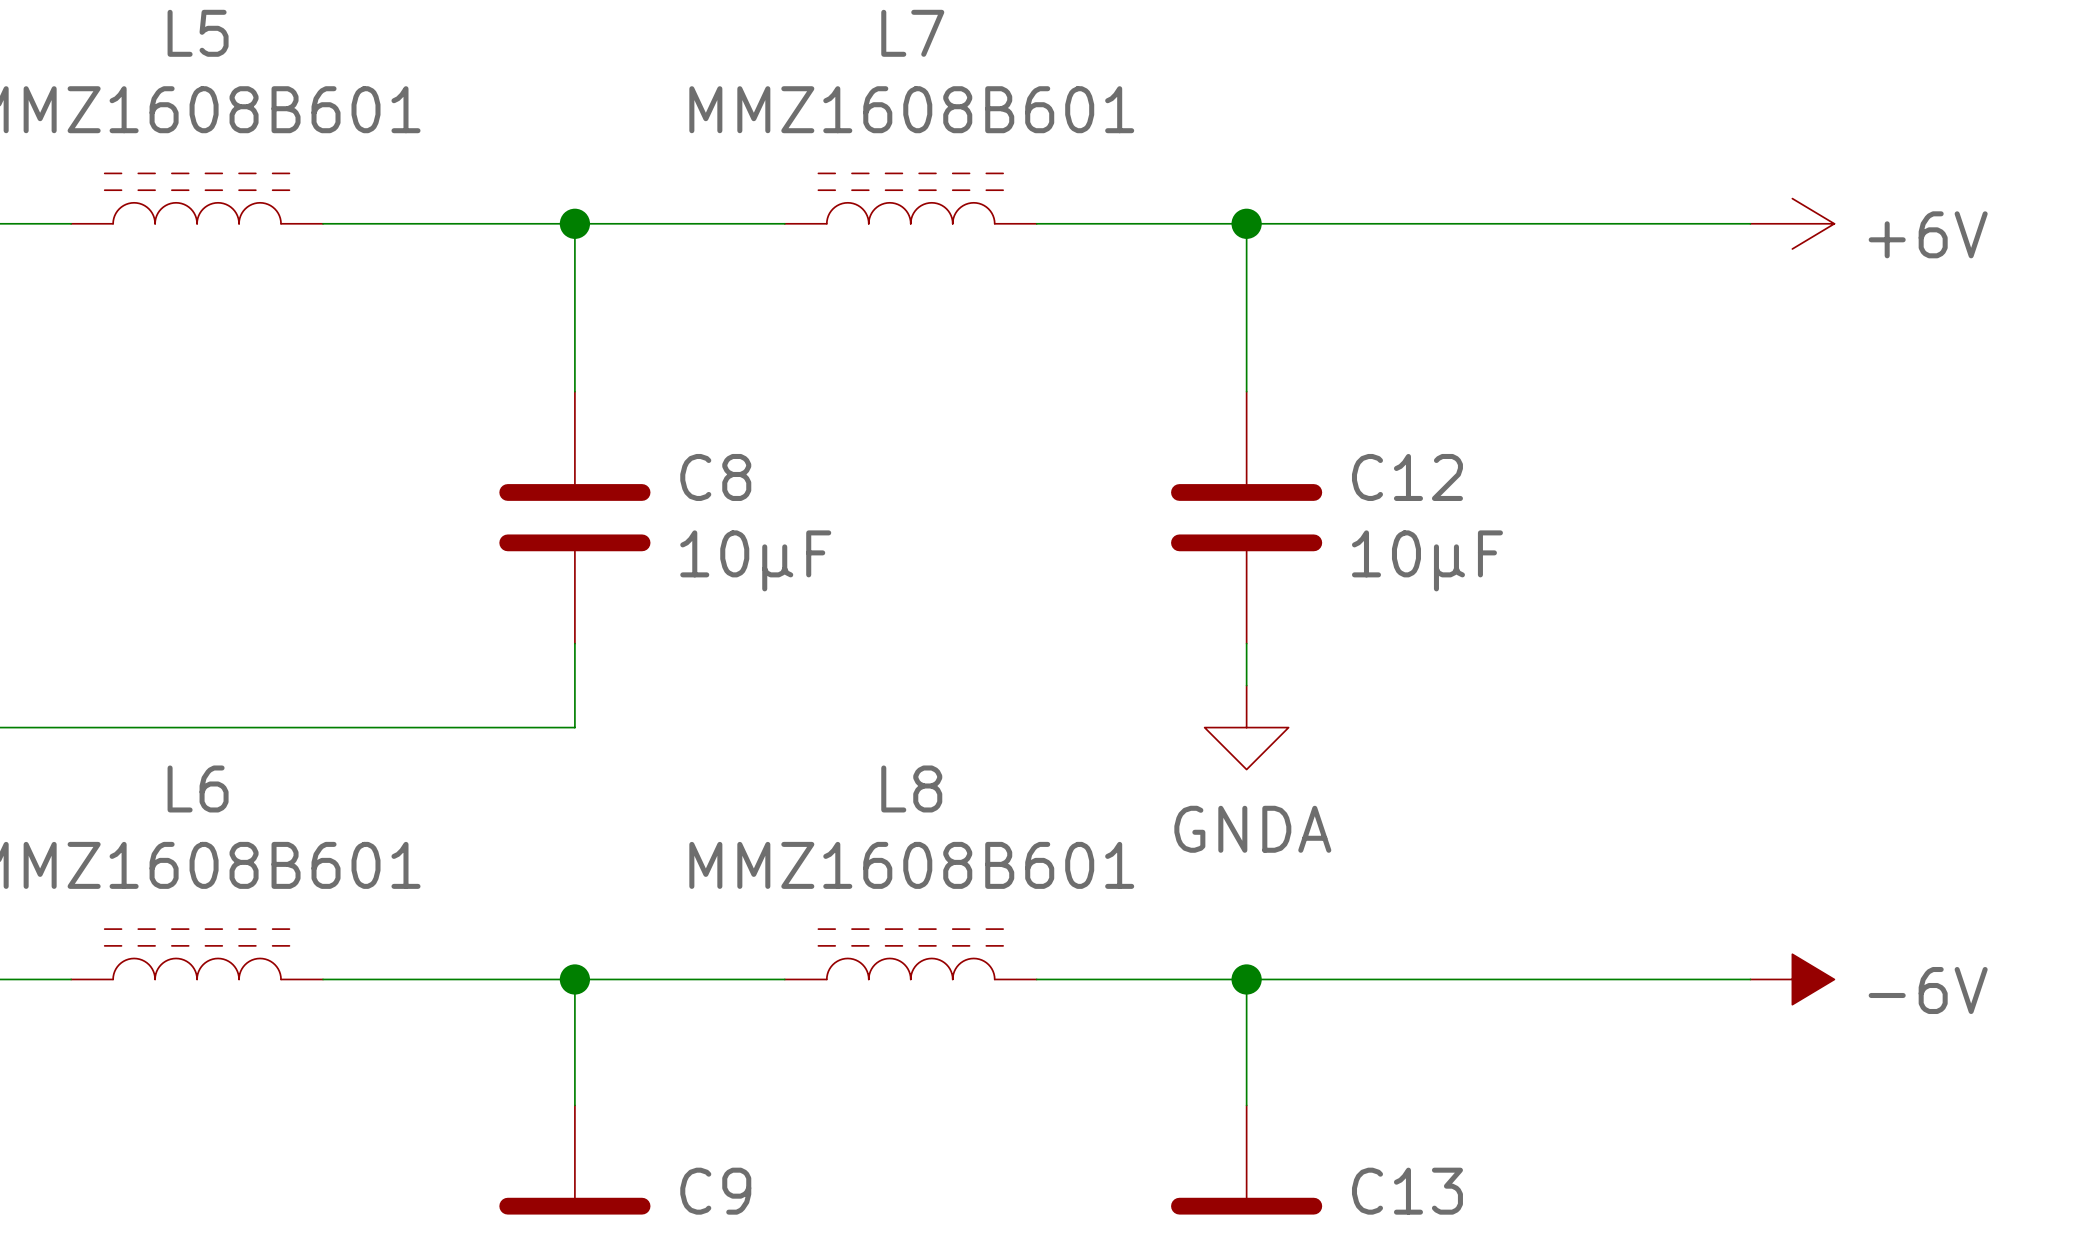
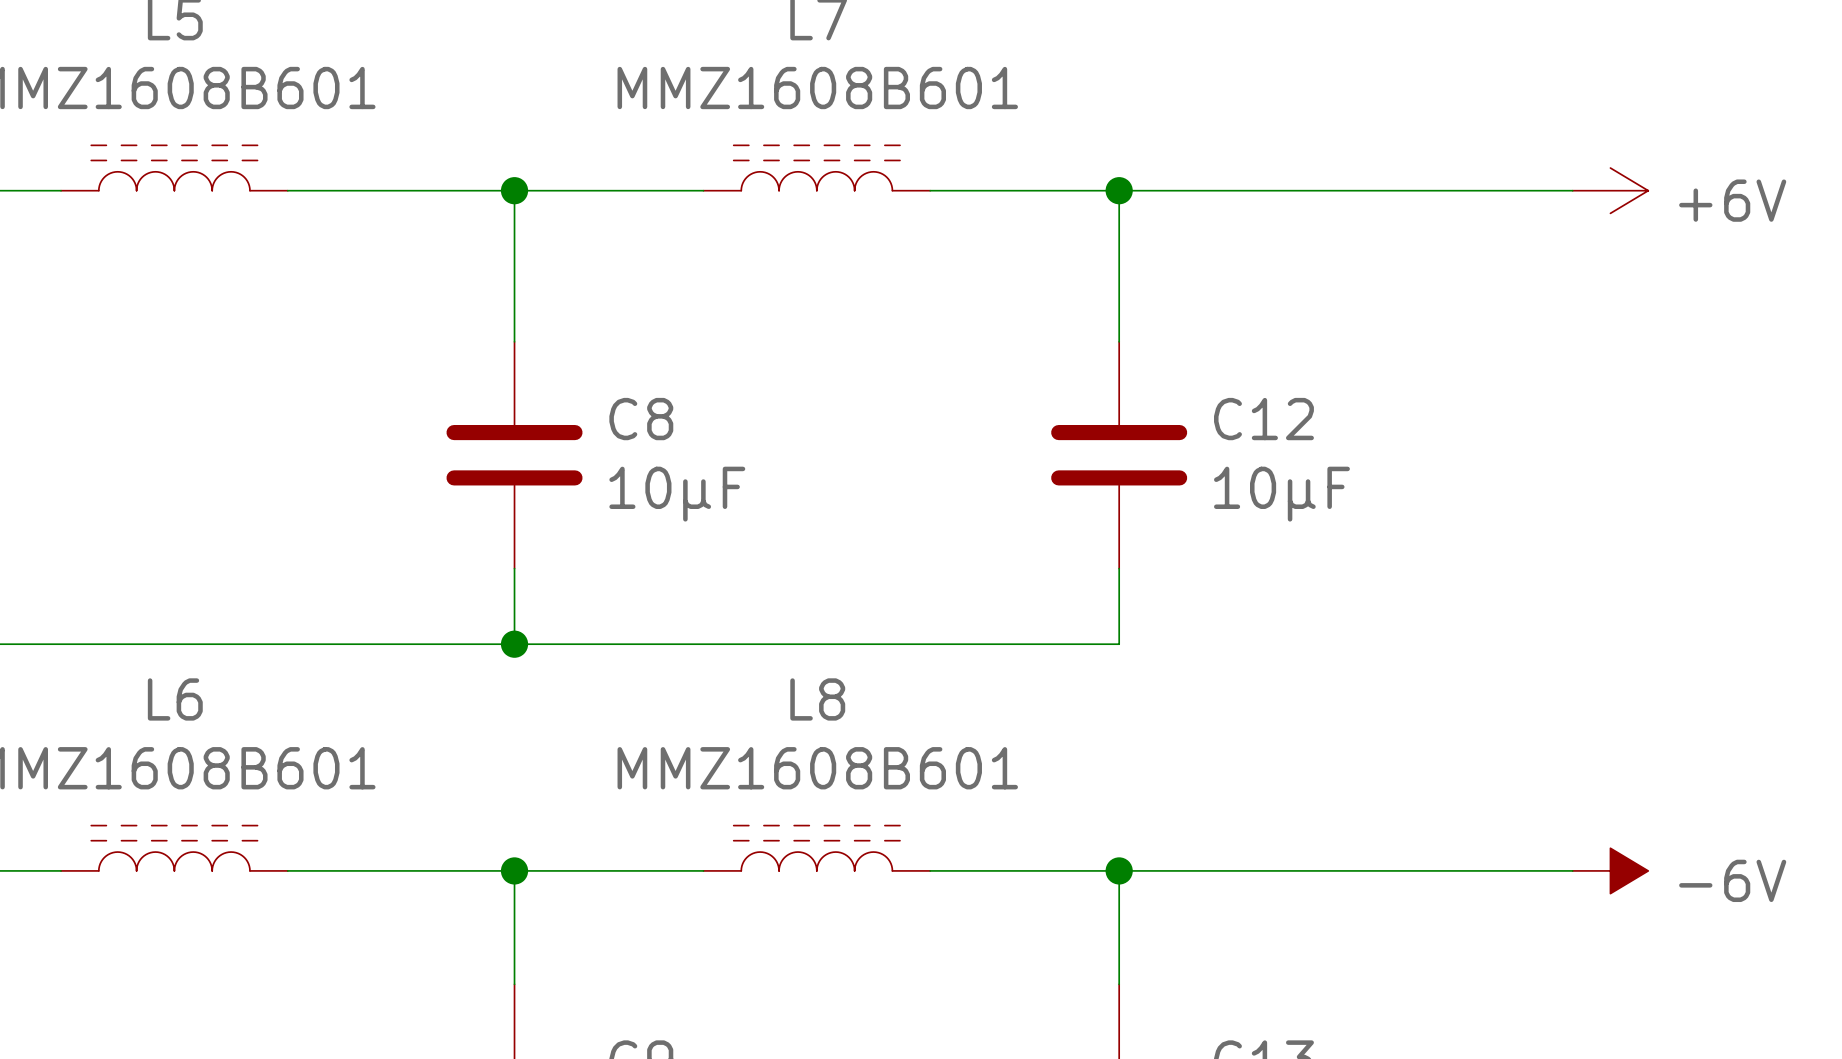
wire: none -> (1119, 606) (1119, 644) (514, 644)
junction: none -> (514, 644)
power symbol: GNDA (1246, 727) -> none

